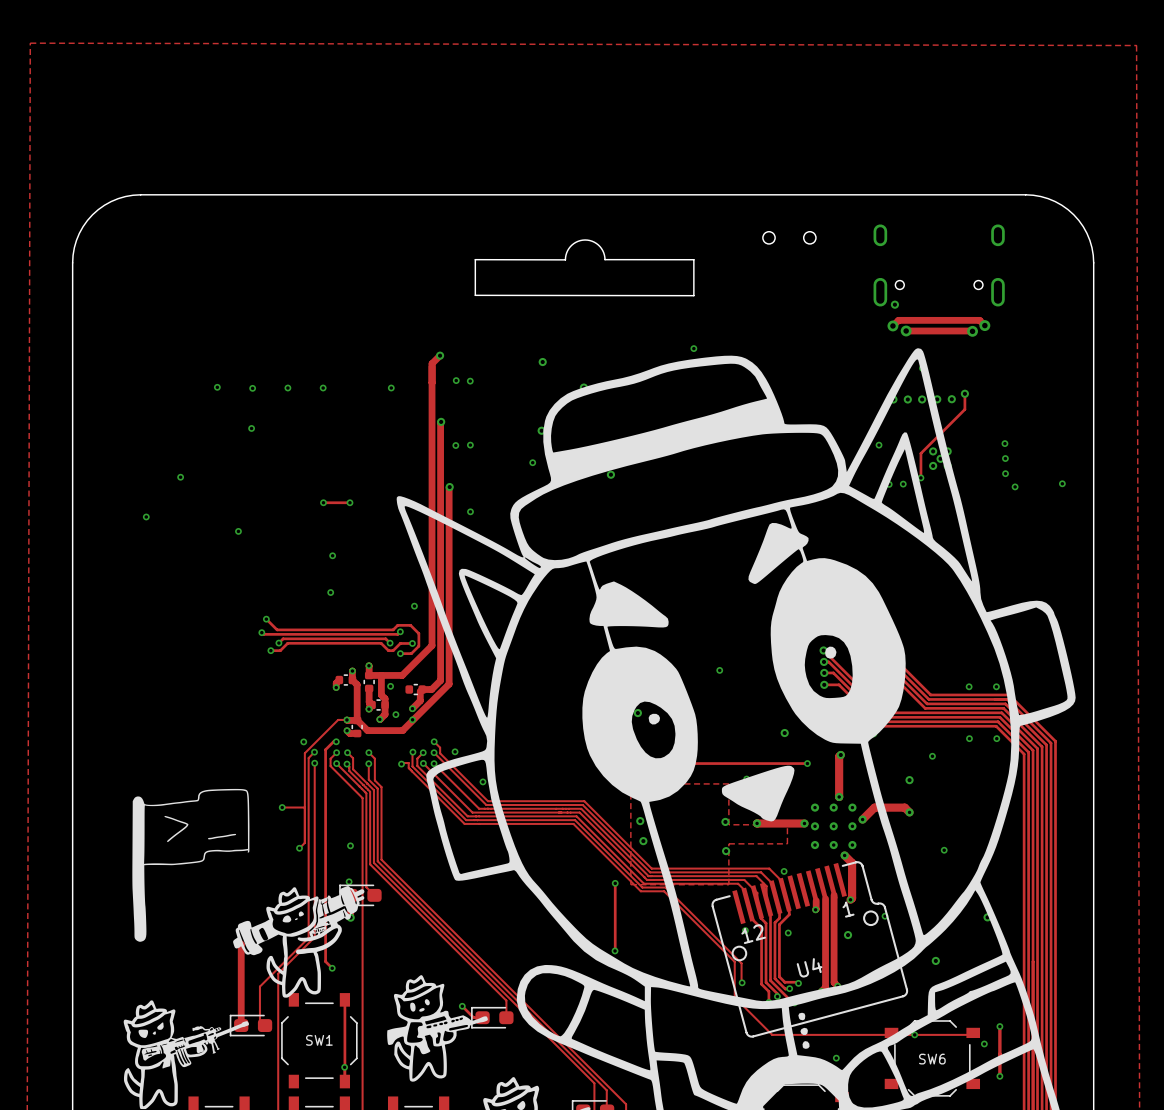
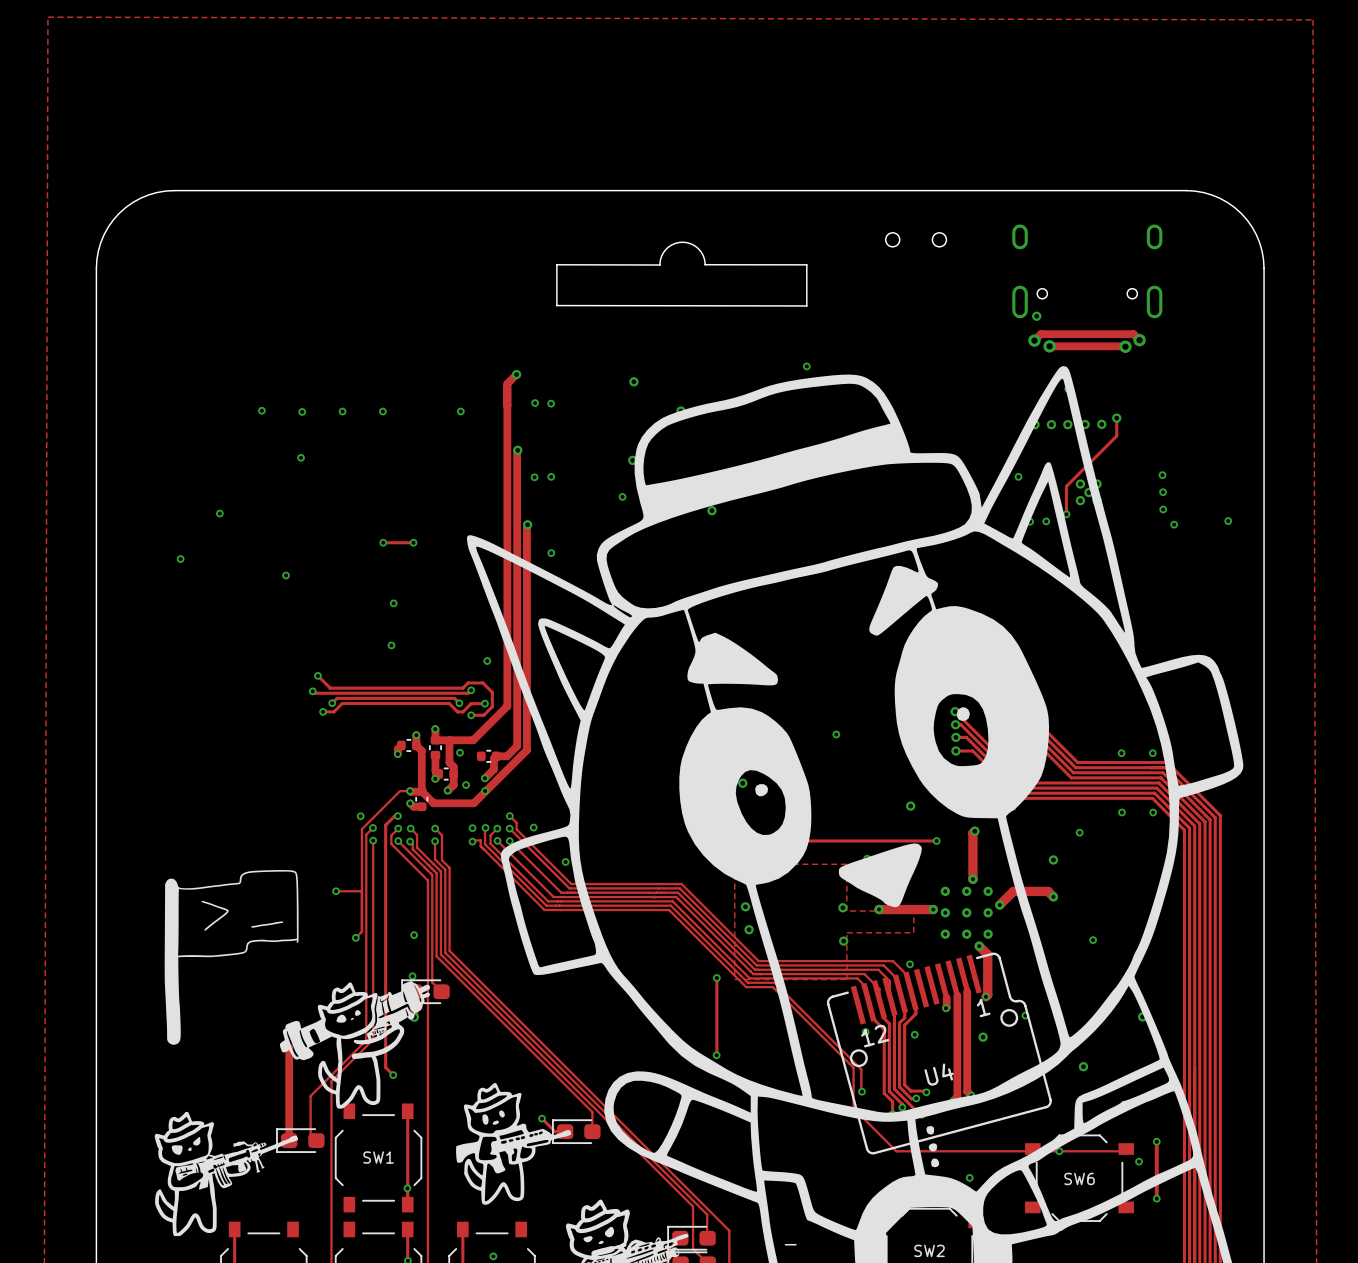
via: none -> (472, 828)

